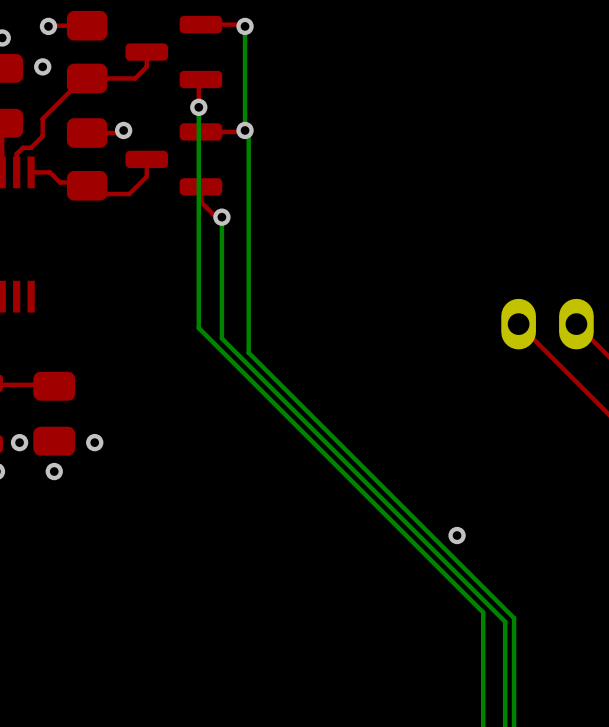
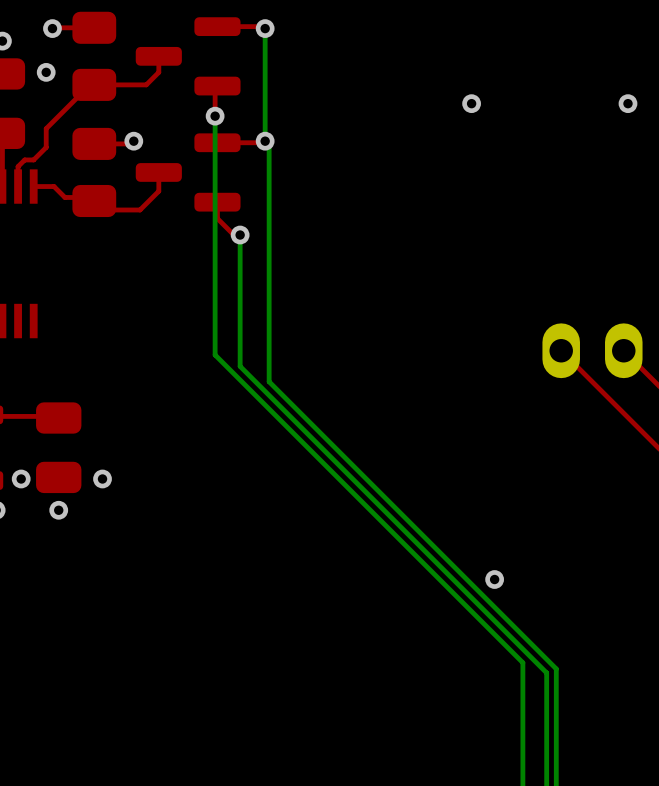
via: none -> (471, 103)
via: none -> (627, 103)

